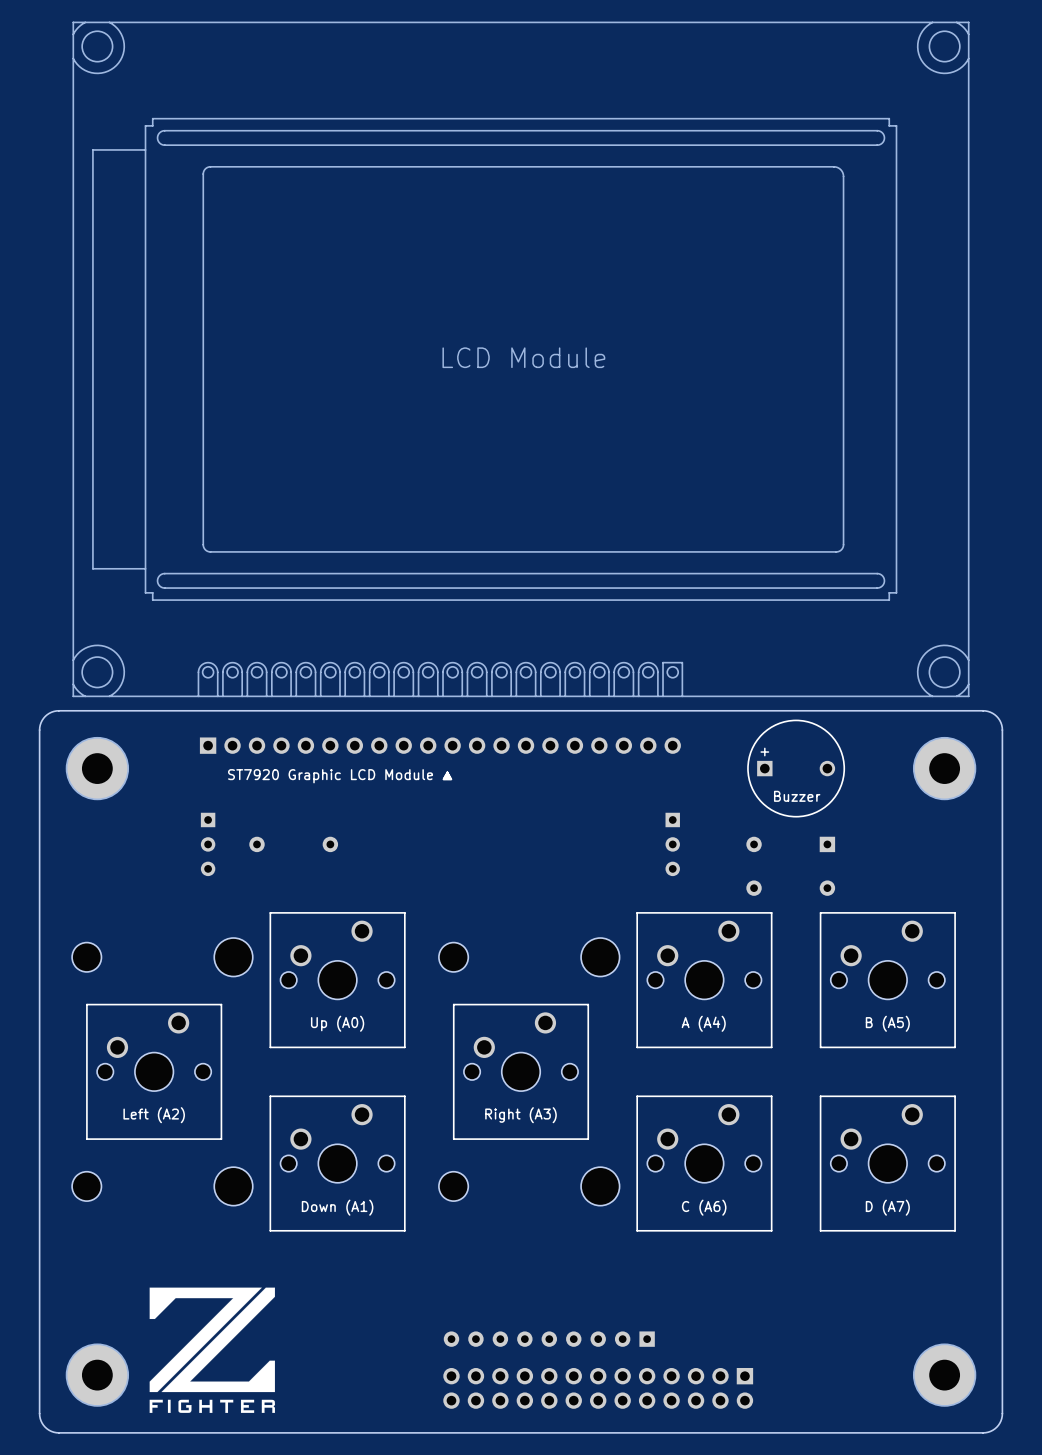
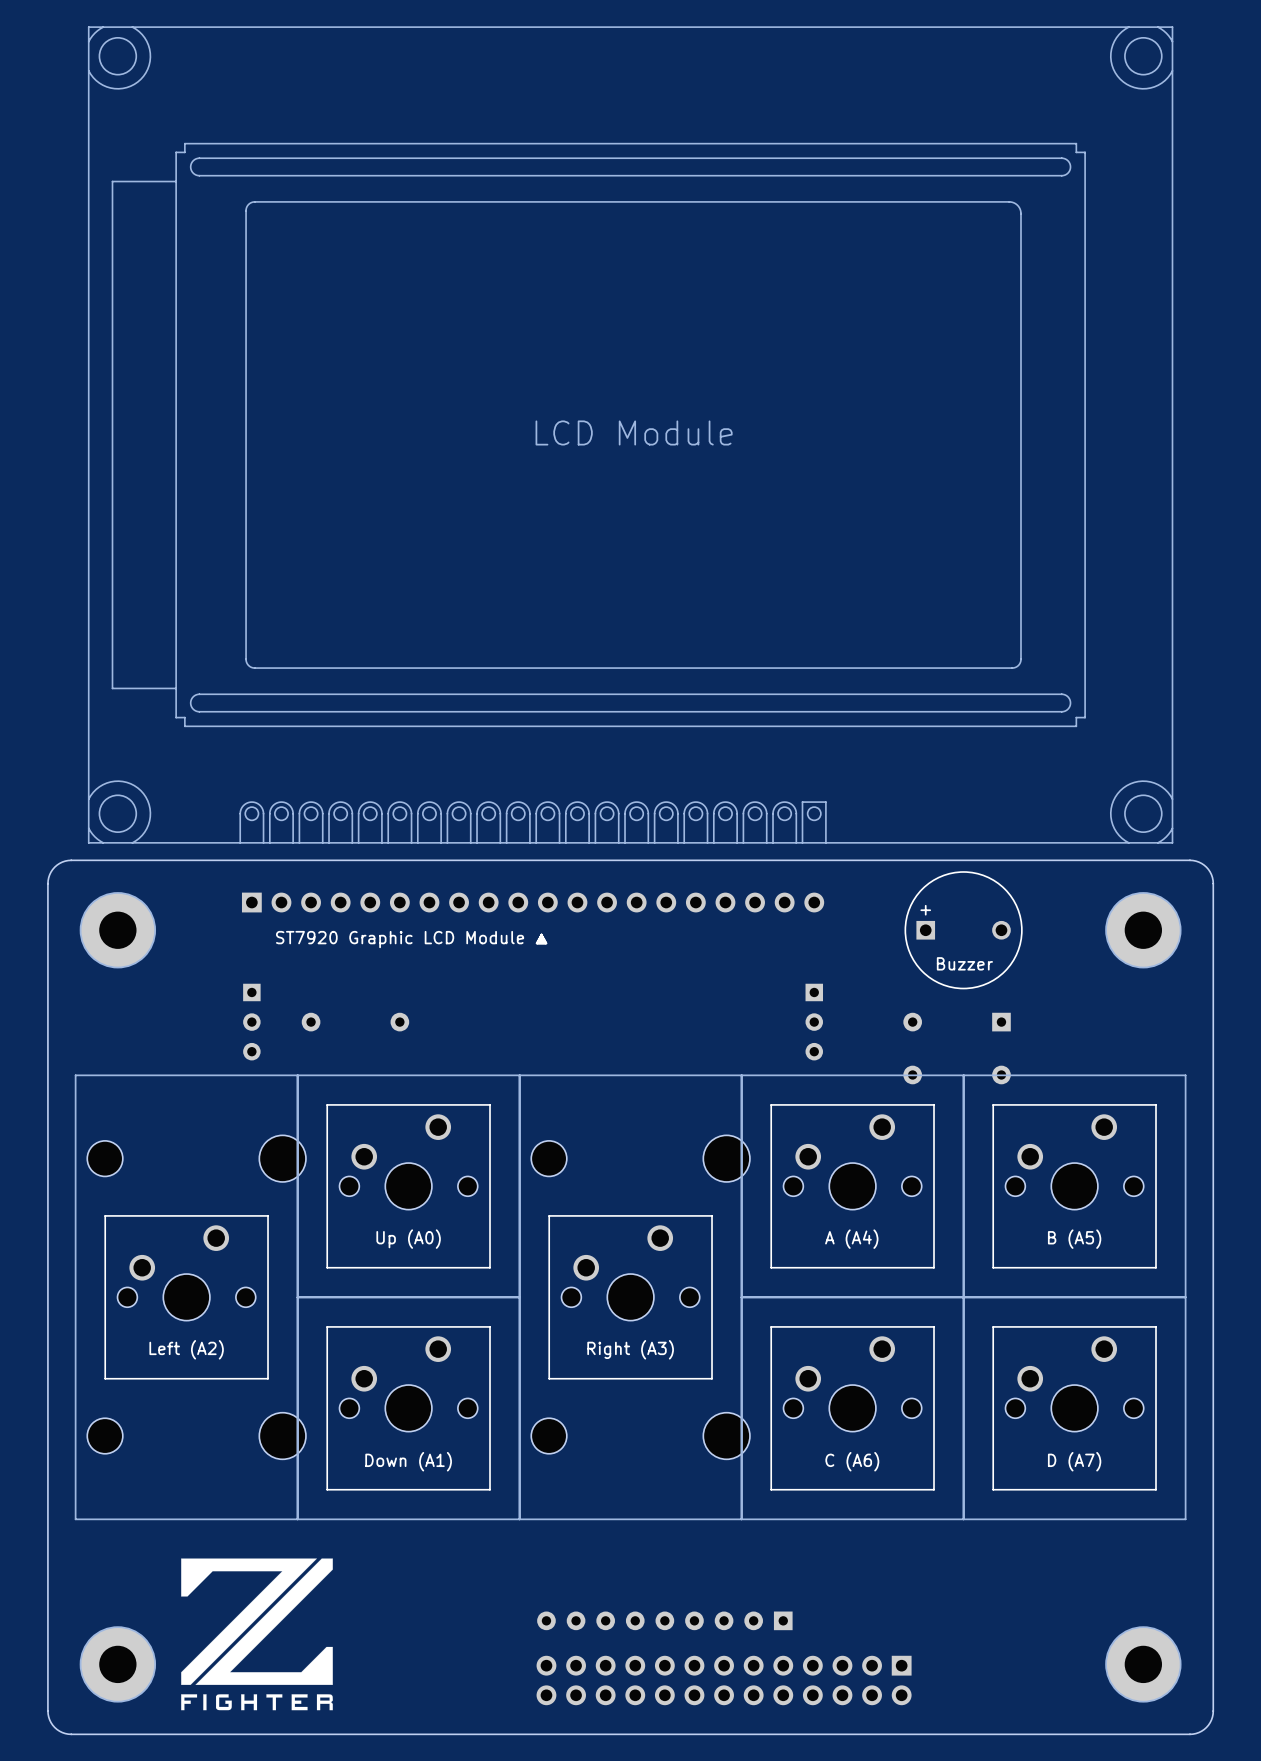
part footprint: [269, 912, 406, 1048] -> [296, 1074, 521, 1299]
part footprint: [636, 912, 773, 1048] -> [740, 1074, 965, 1299]
part footprint: [819, 912, 956, 1048] -> [962, 1074, 1187, 1299]
part footprint: [72, 938, 253, 1206] -> [74, 1074, 306, 1521]
part footprint: [438, 938, 620, 1206] -> [518, 1074, 750, 1521]
part footprint: [269, 1095, 406, 1232] -> [296, 1296, 521, 1521]
part footprint: [636, 1095, 773, 1232] -> [740, 1296, 965, 1521]
part footprint: [819, 1095, 956, 1232] -> [962, 1296, 1187, 1521]

